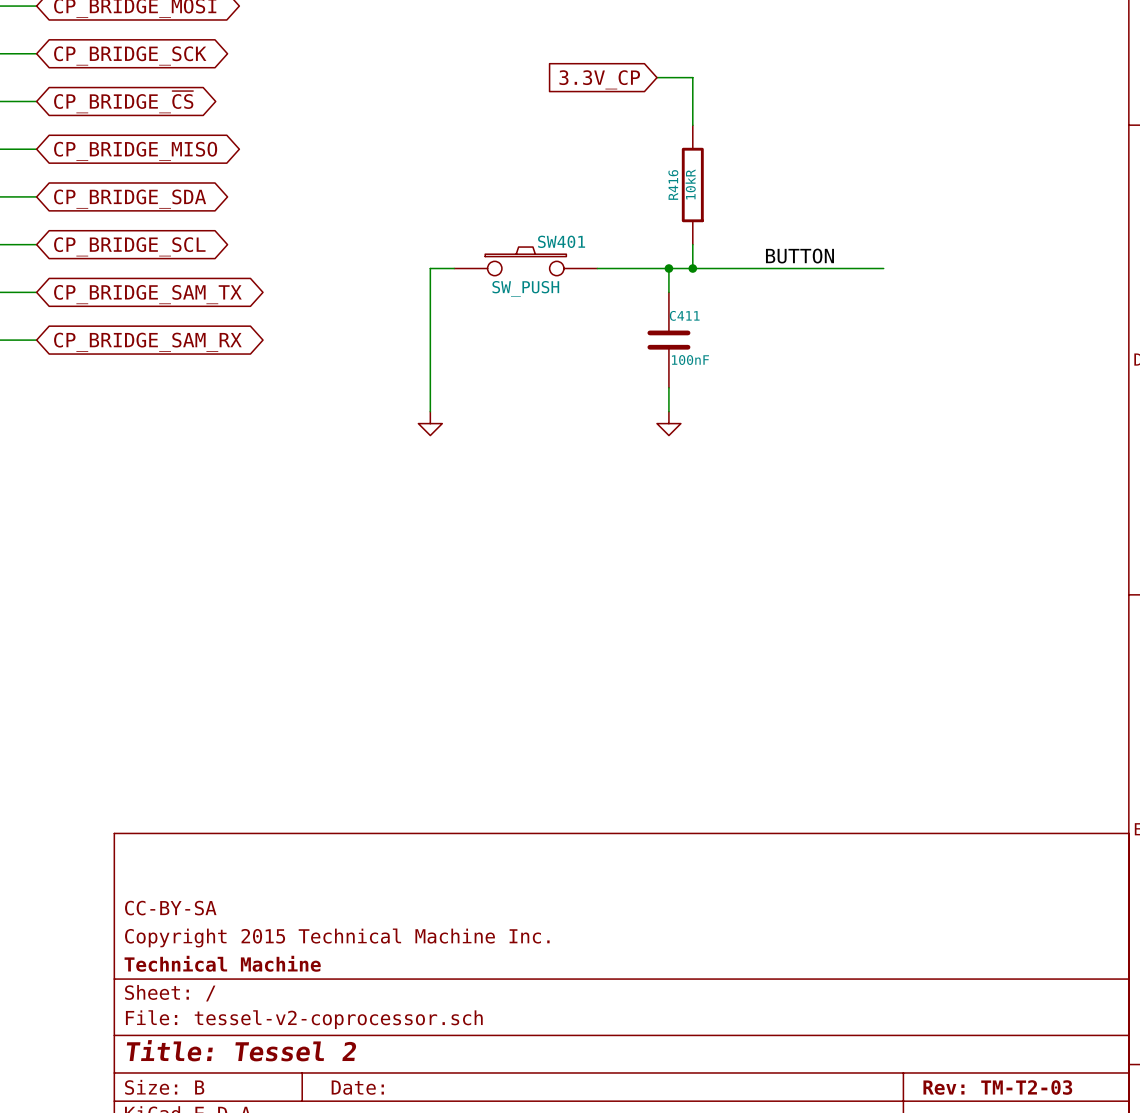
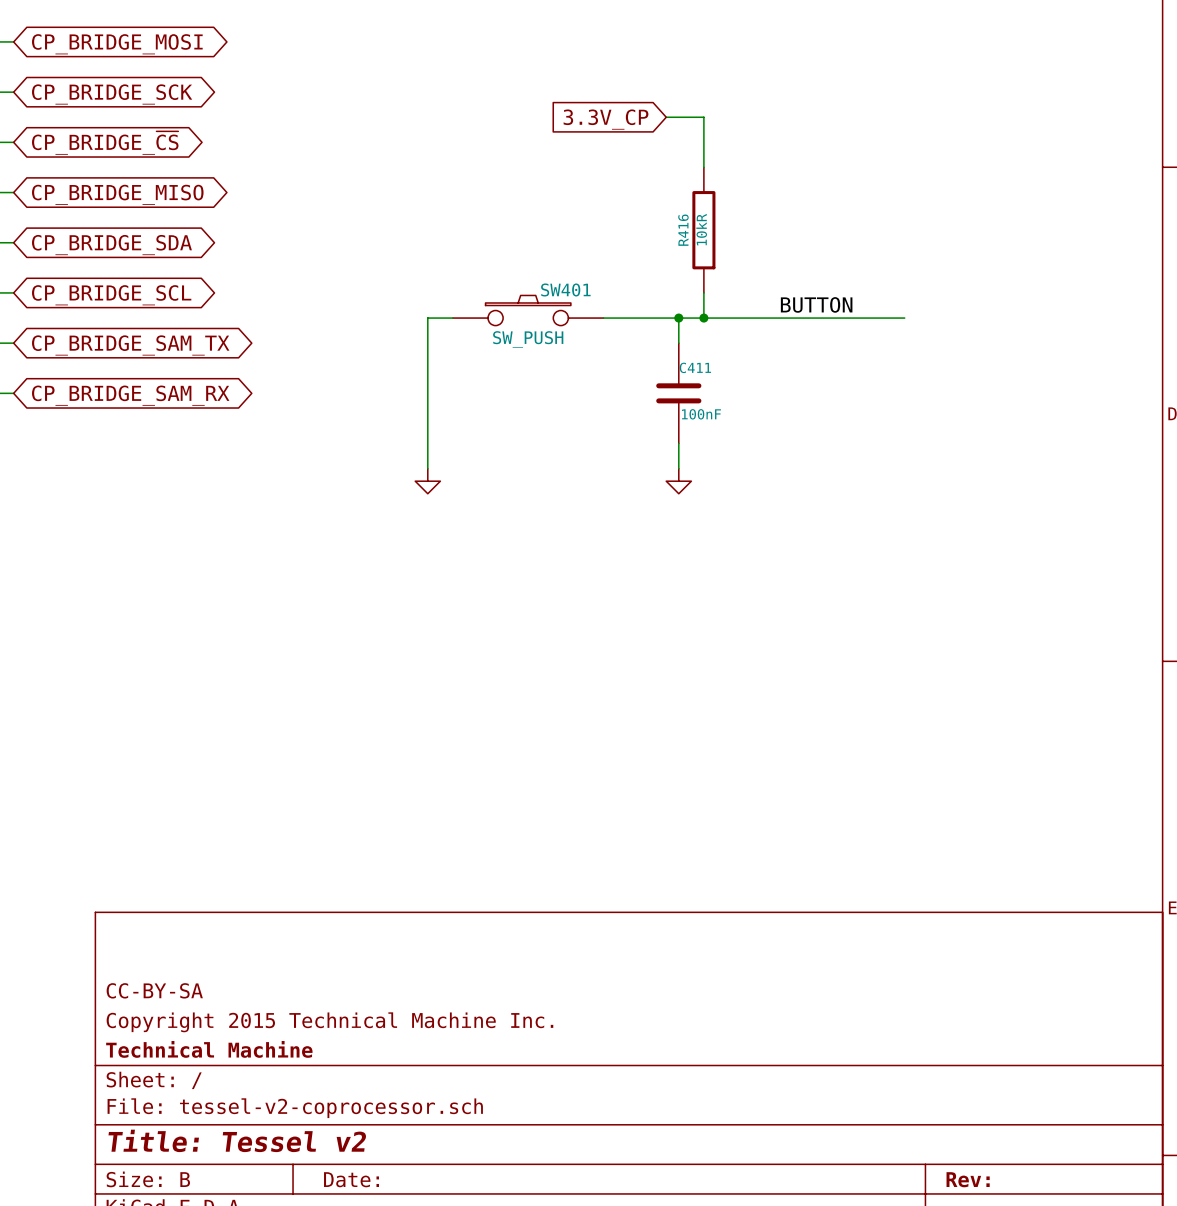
title block: Title: Tessel 2 (241, 1050) -> Title: Tessel v2 (237, 1140)
title block: Rev: TM-T2-03 (997, 1087) -> Rev: (968, 1179)

